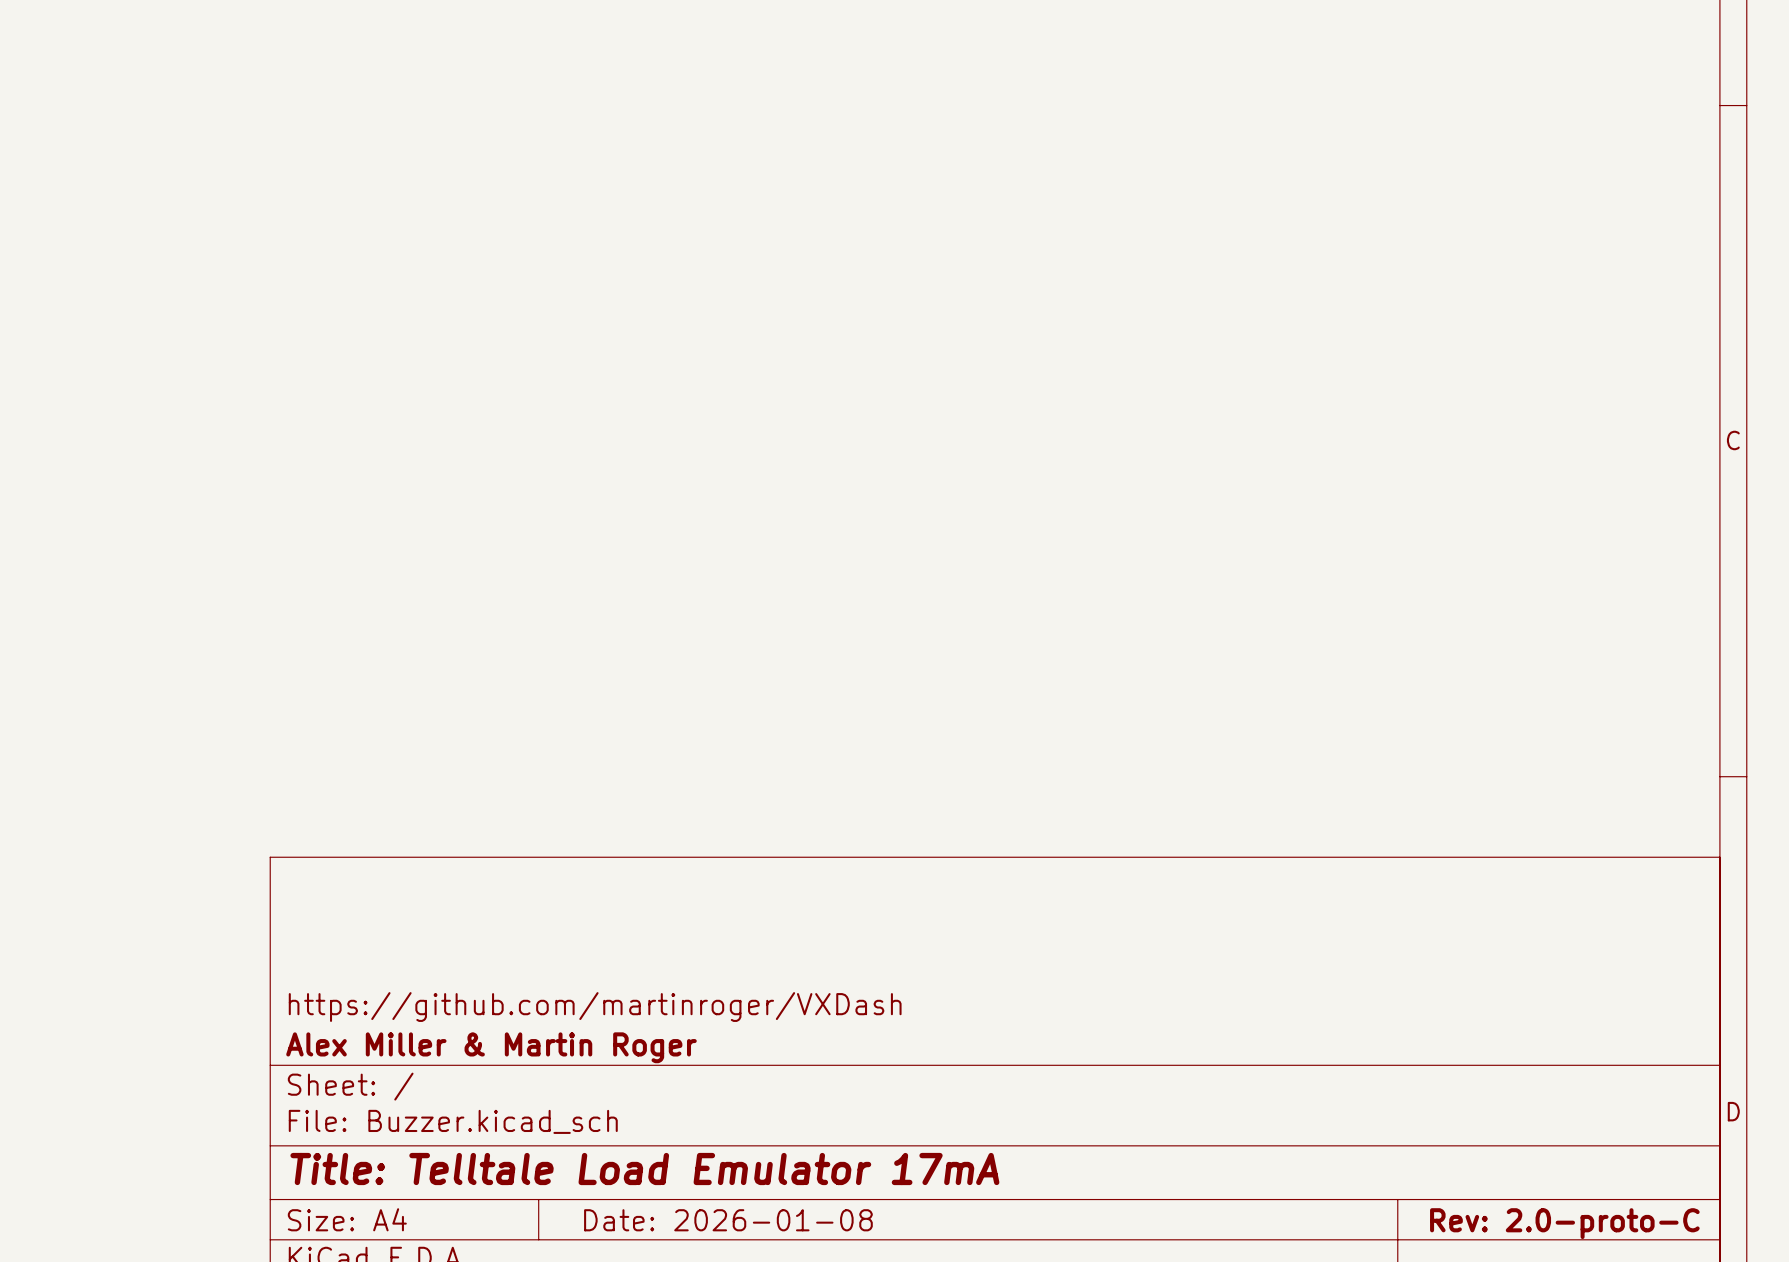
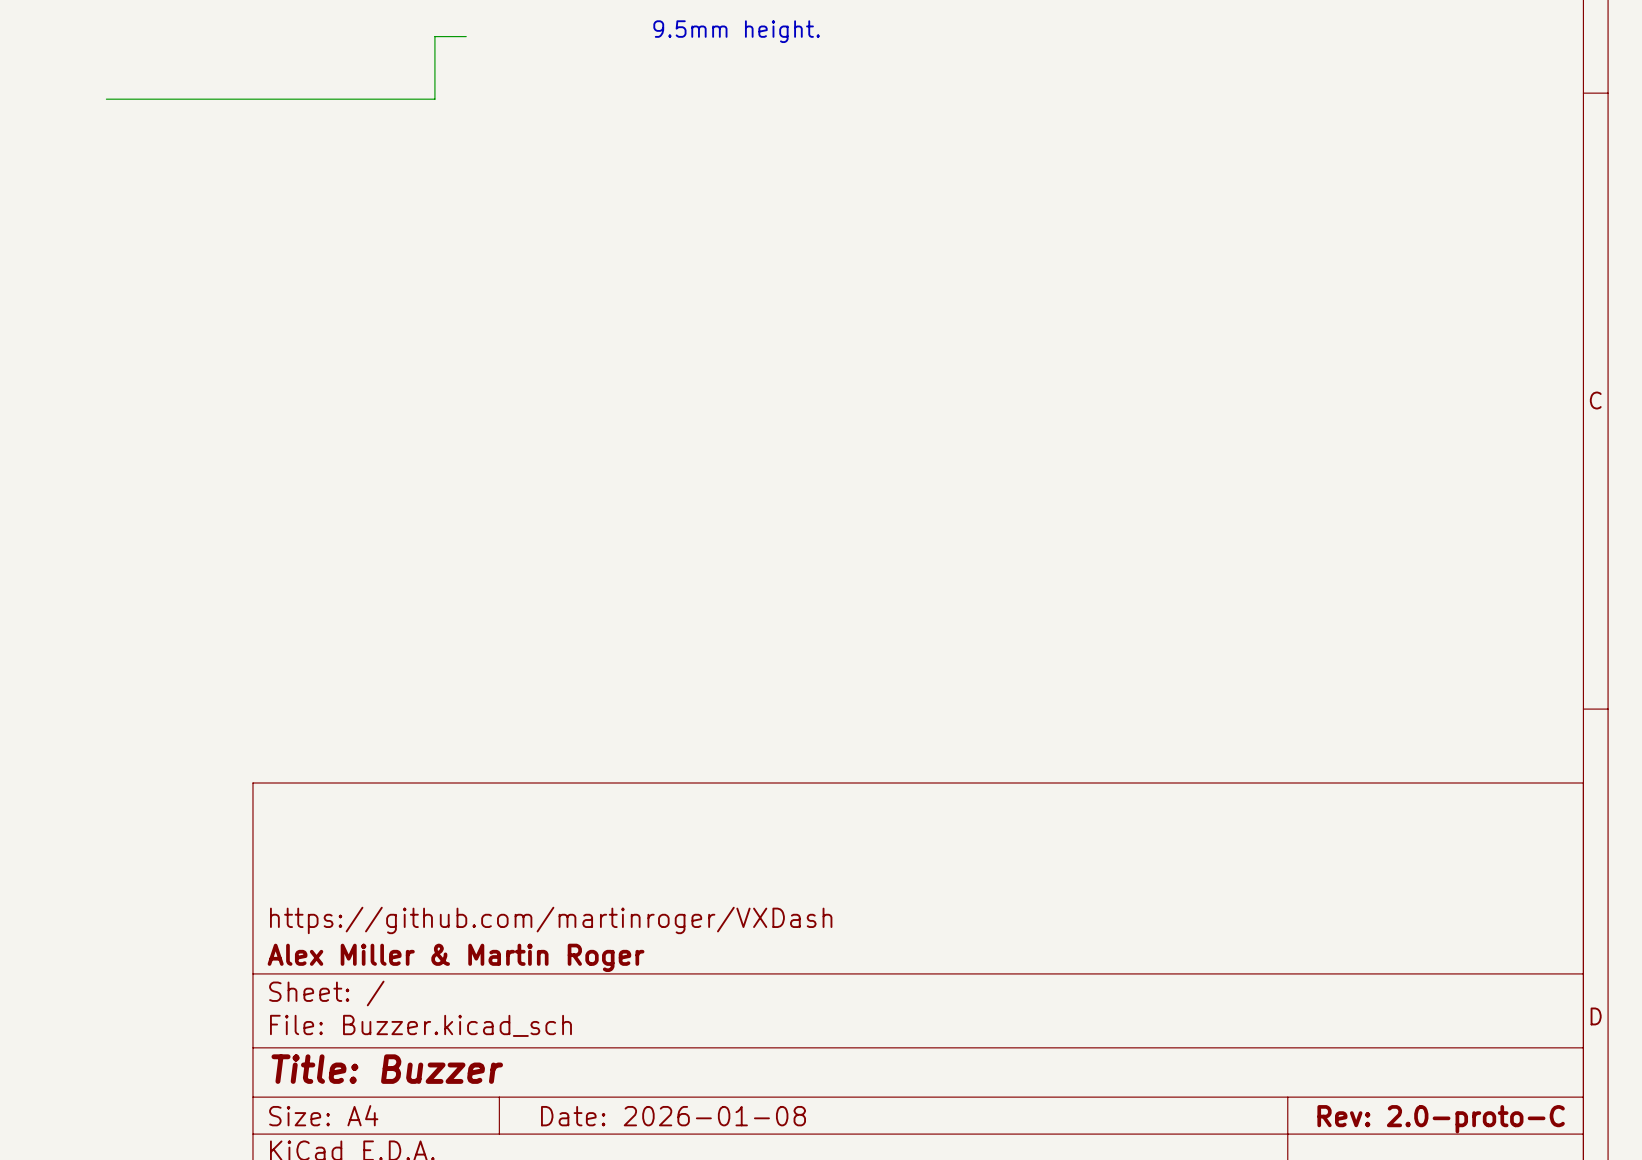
text: none -> 9.5mm height. (736, 31)
wire: none -> (466, 36) (434, 36) (434, 99) (106, 99)
title block: Title: Telltale Load Emulator 17mA (644, 1169) -> Title: Buzzer (387, 1069)

